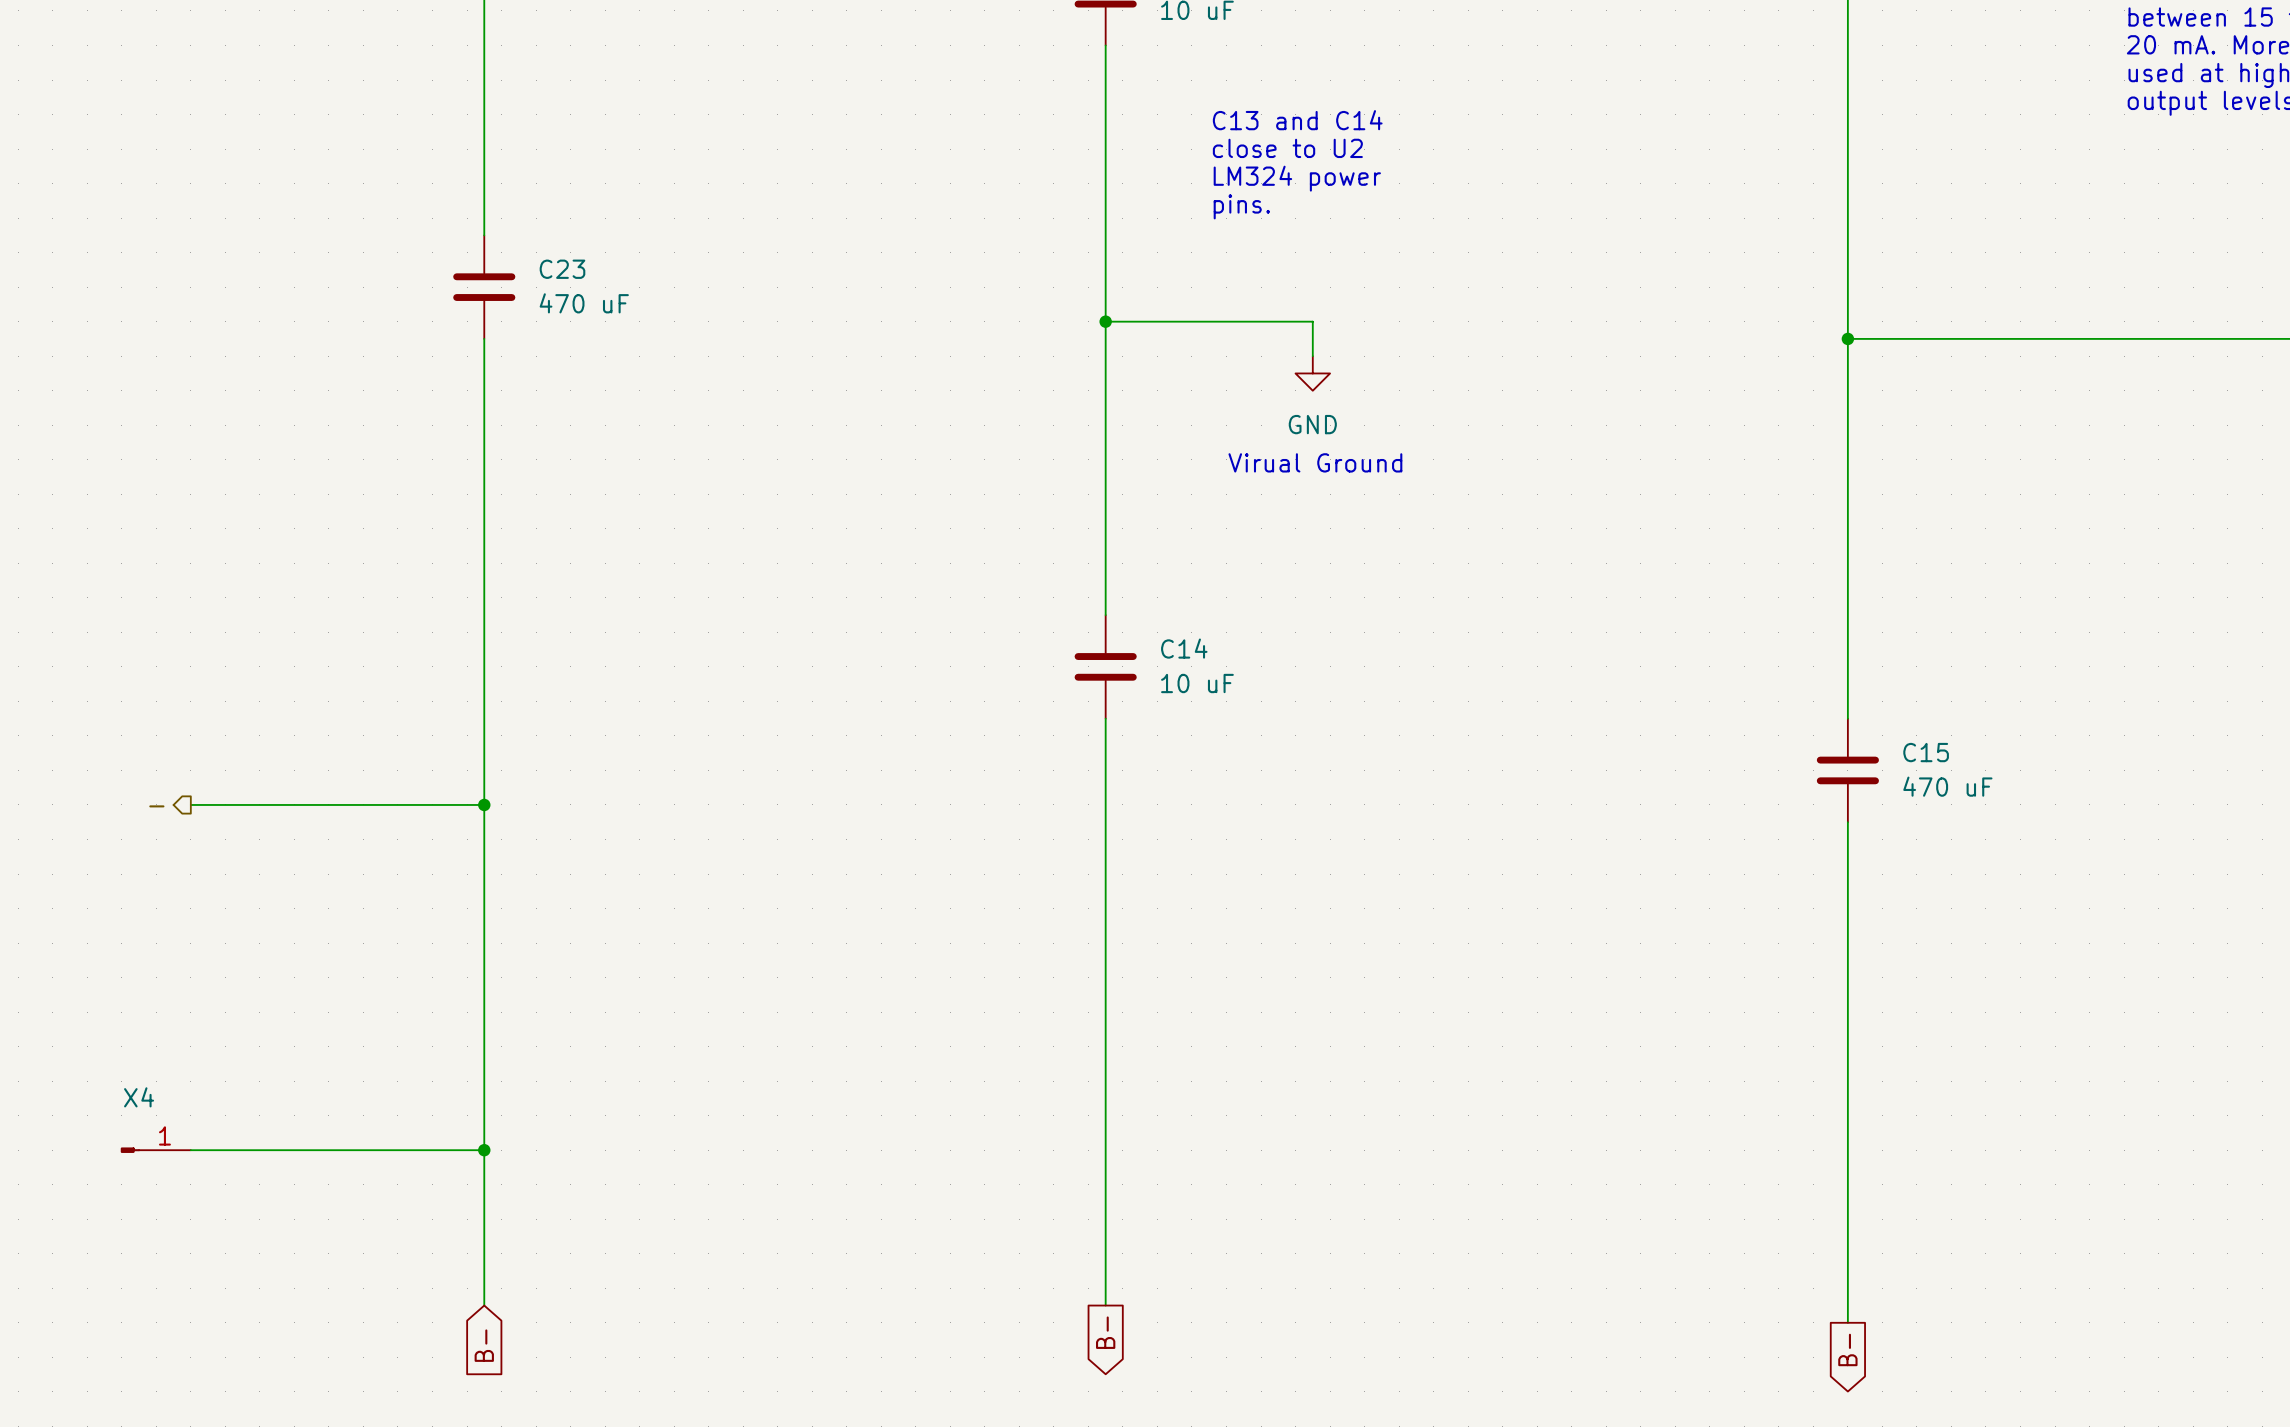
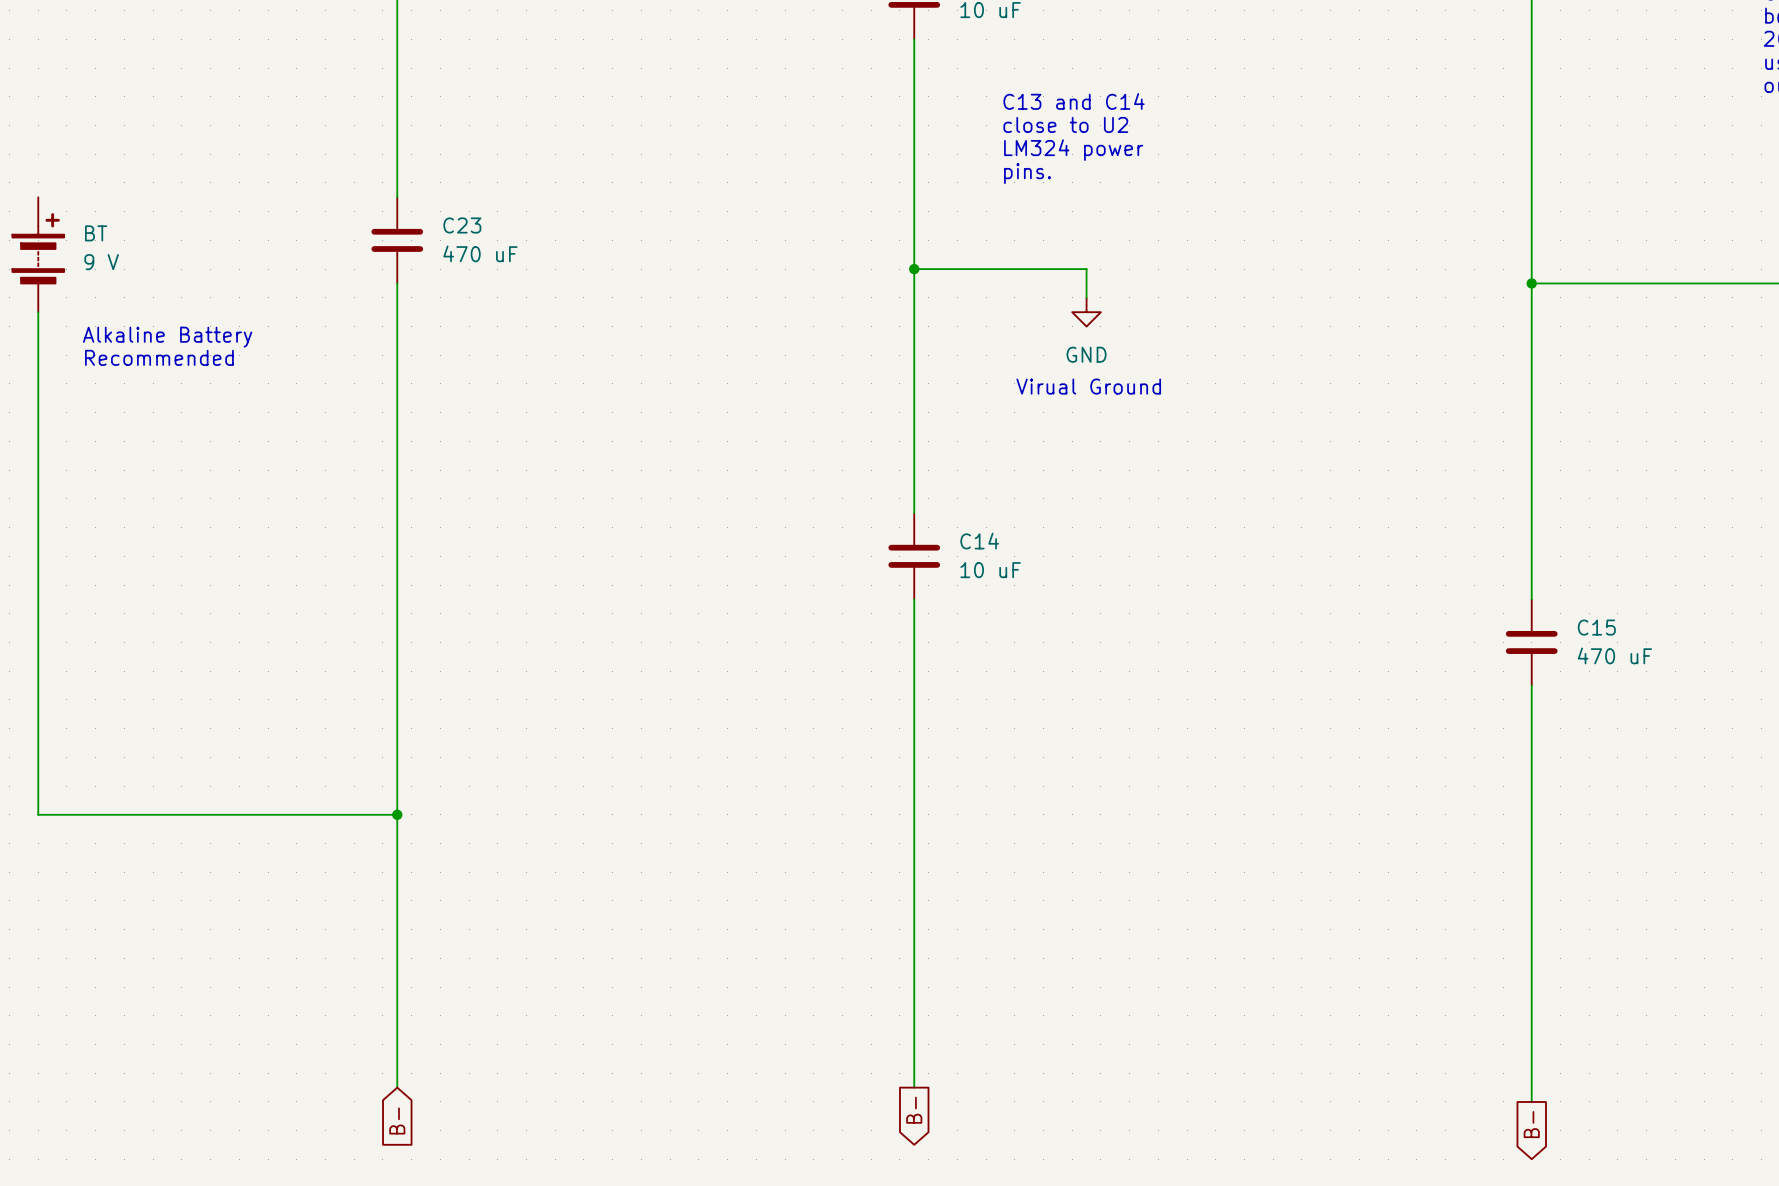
BT: none -> 9 V (38, 254)
wire: none -> (38, 312) (38, 814) (397, 814)
text: none -> Alkaline Battery (167, 337)
text: none -> Recommended (159, 357)
wire: (190, 804) (484, 804) -> none
junction: (484, 804) -> none
hierarchical label: - (156, 806) -> none
junction: none -> (397, 814)
X4: (155, 1150) -> none
wire: (190, 1150) (484, 1150) -> none
junction: (484, 1150) -> none

